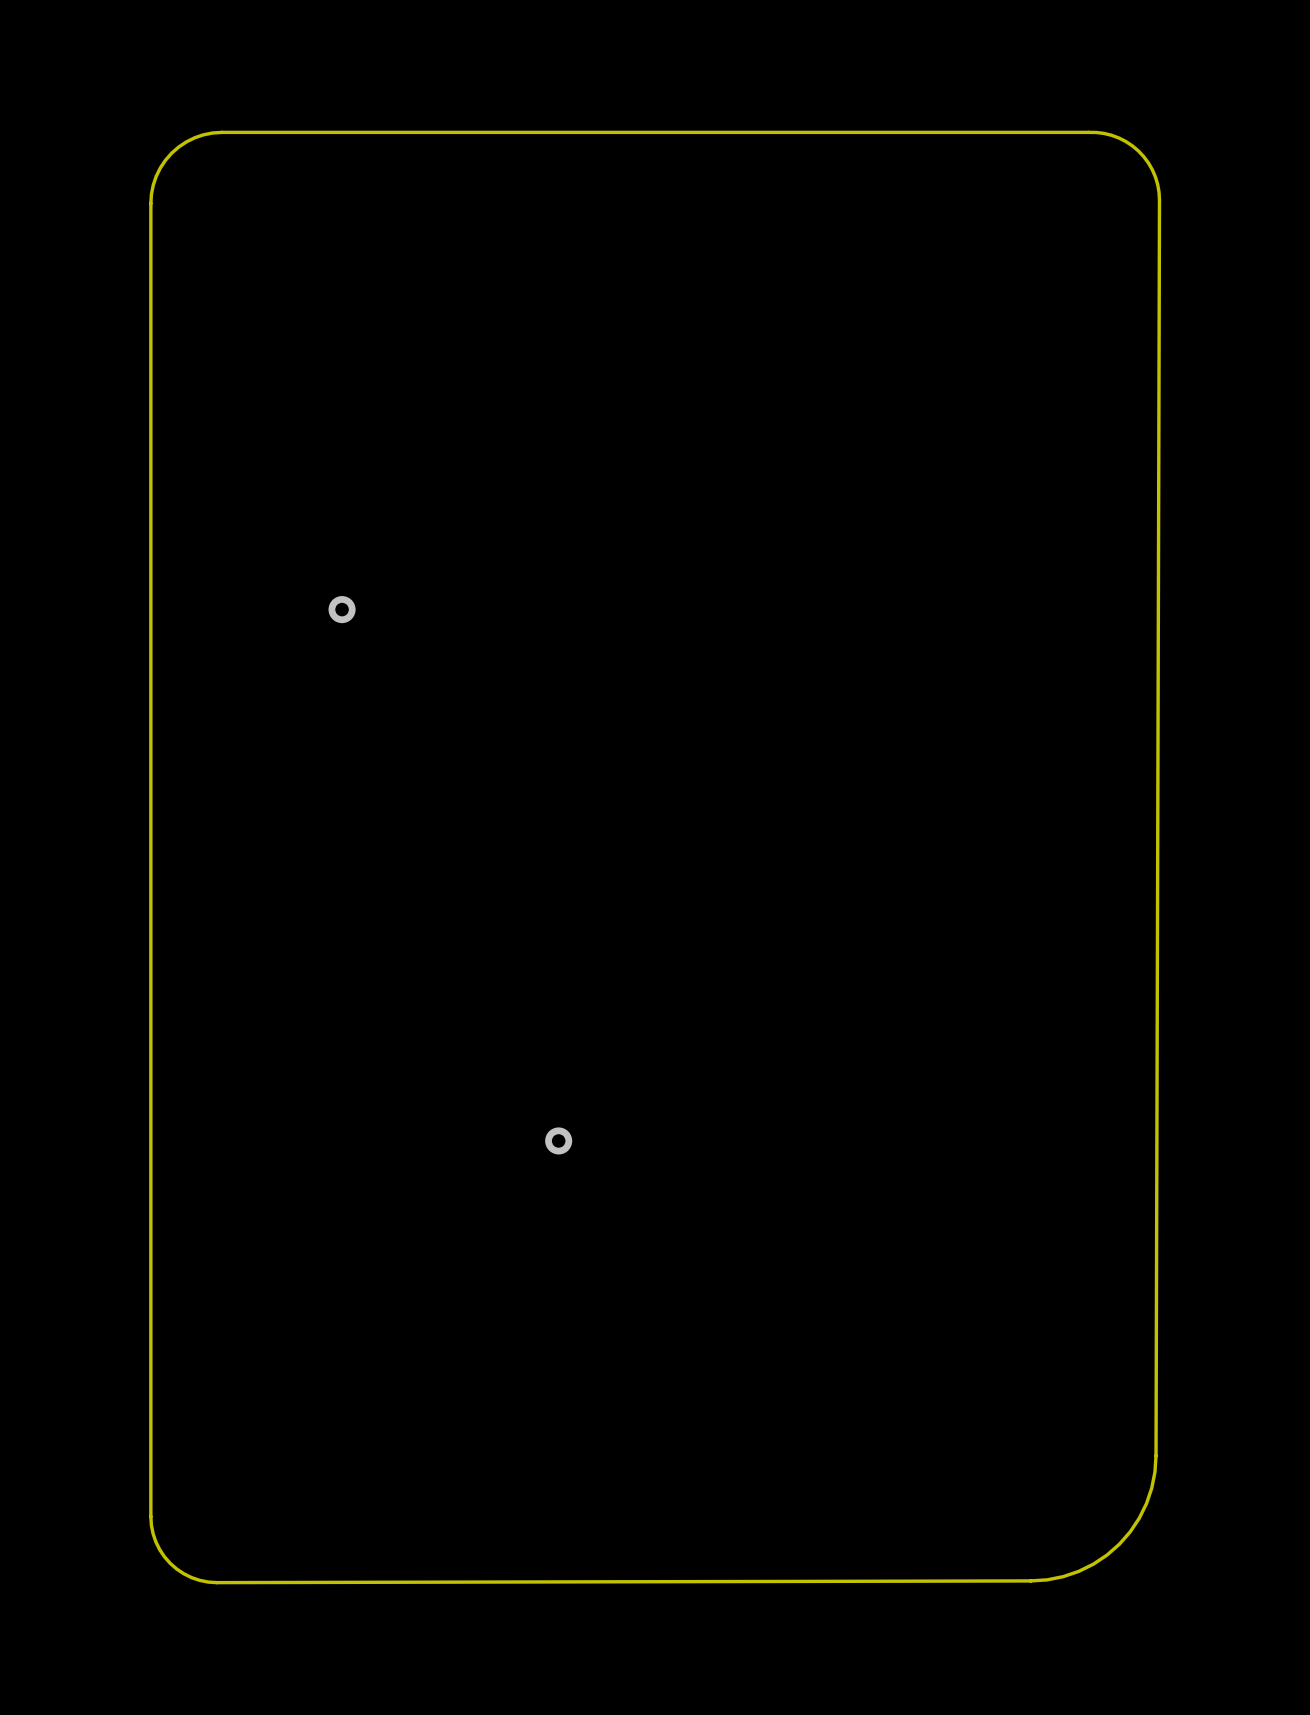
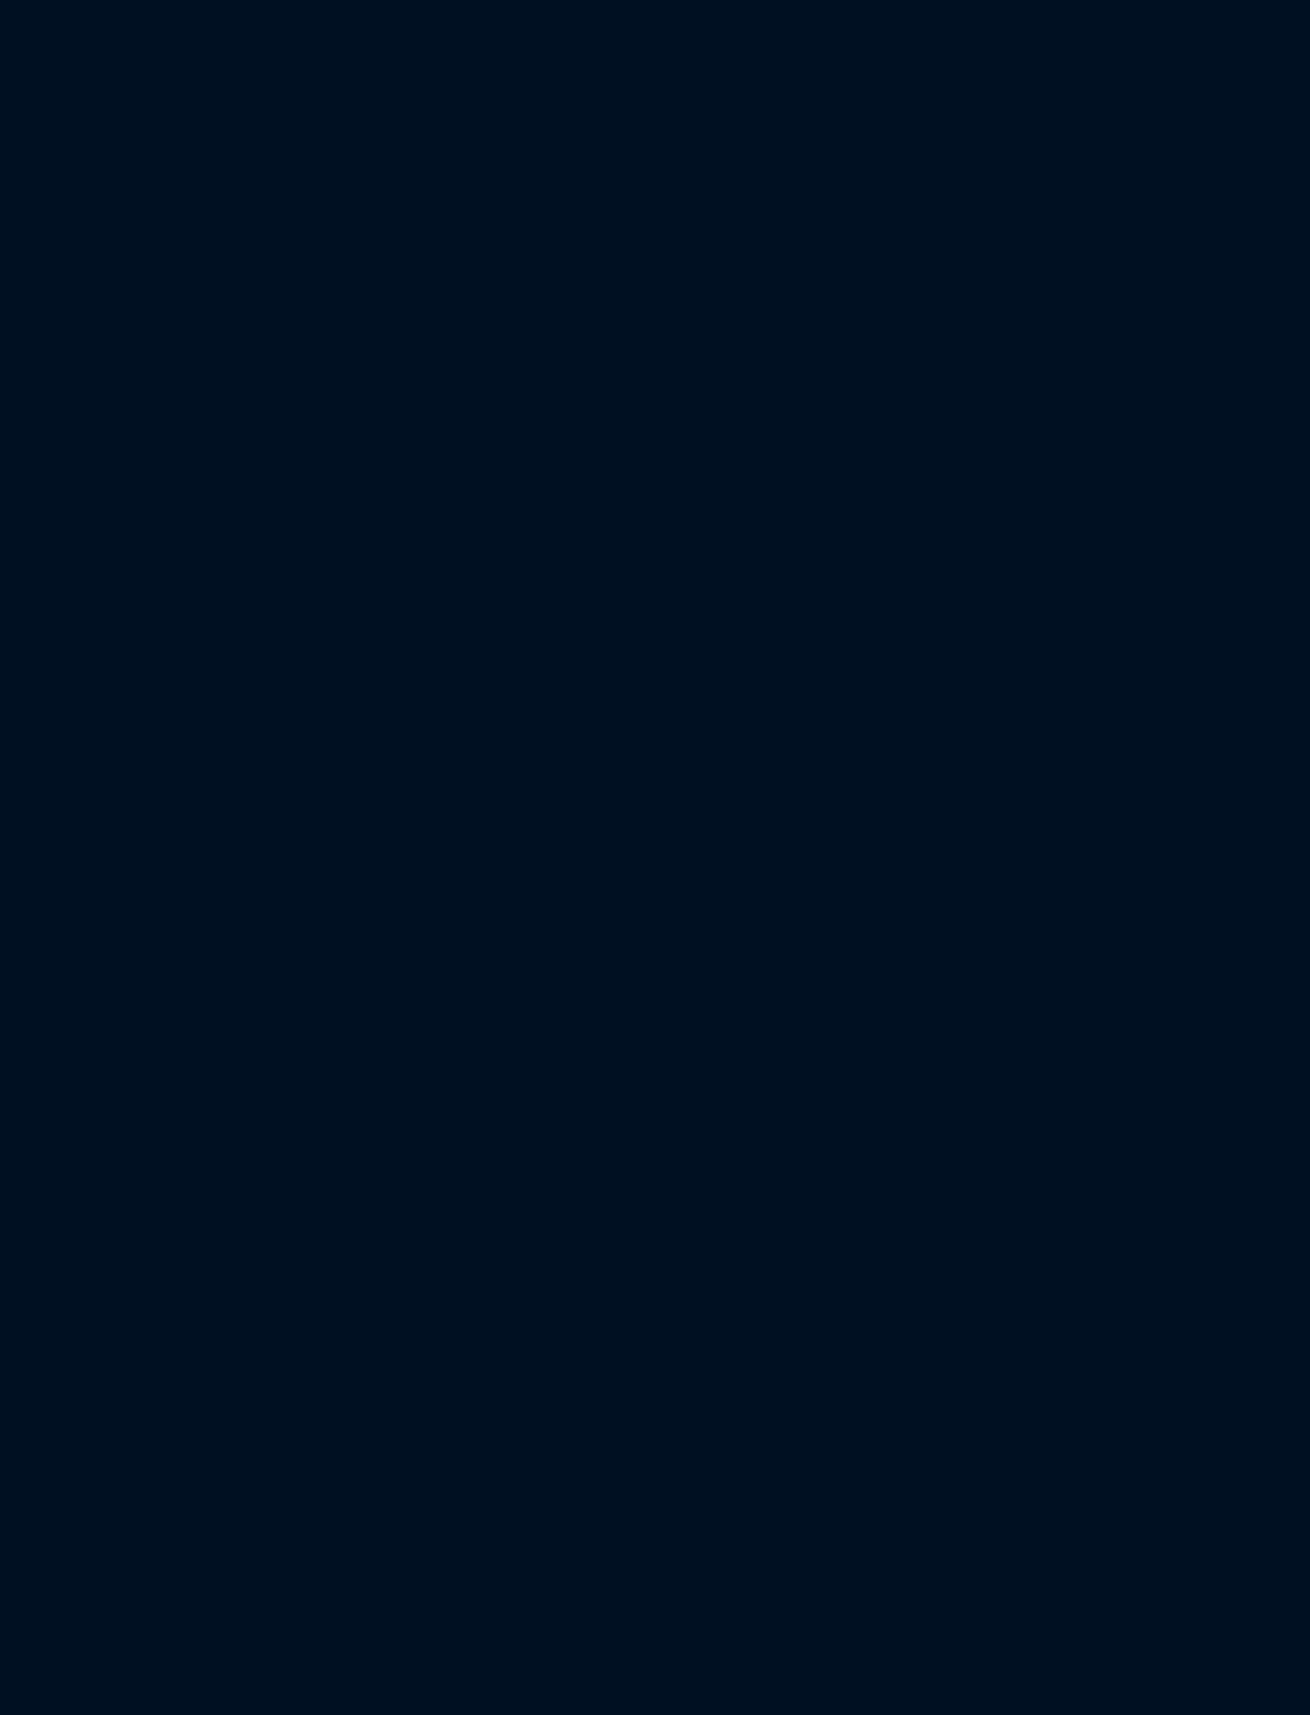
board edge: (1088, 132) (221, 132) (203, 134) (186, 141) (171, 153) (160, 167) (153, 185) (150, 203) (150, 1516) (153, 1533) (159, 1549) (170, 1563) (183, 1573) (199, 1580) (216, 1582) (1030, 1580) (1063, 1576) (1093, 1564) (1119, 1544) (1139, 1518) (1151, 1488) (1156, 1455) (1159, 200) (1157, 184) (1152, 169) (1138, 150) (1125, 141) (1111, 135) (1088, 132) -> none
via: (342, 609) -> none
via: (558, 1140) -> none

